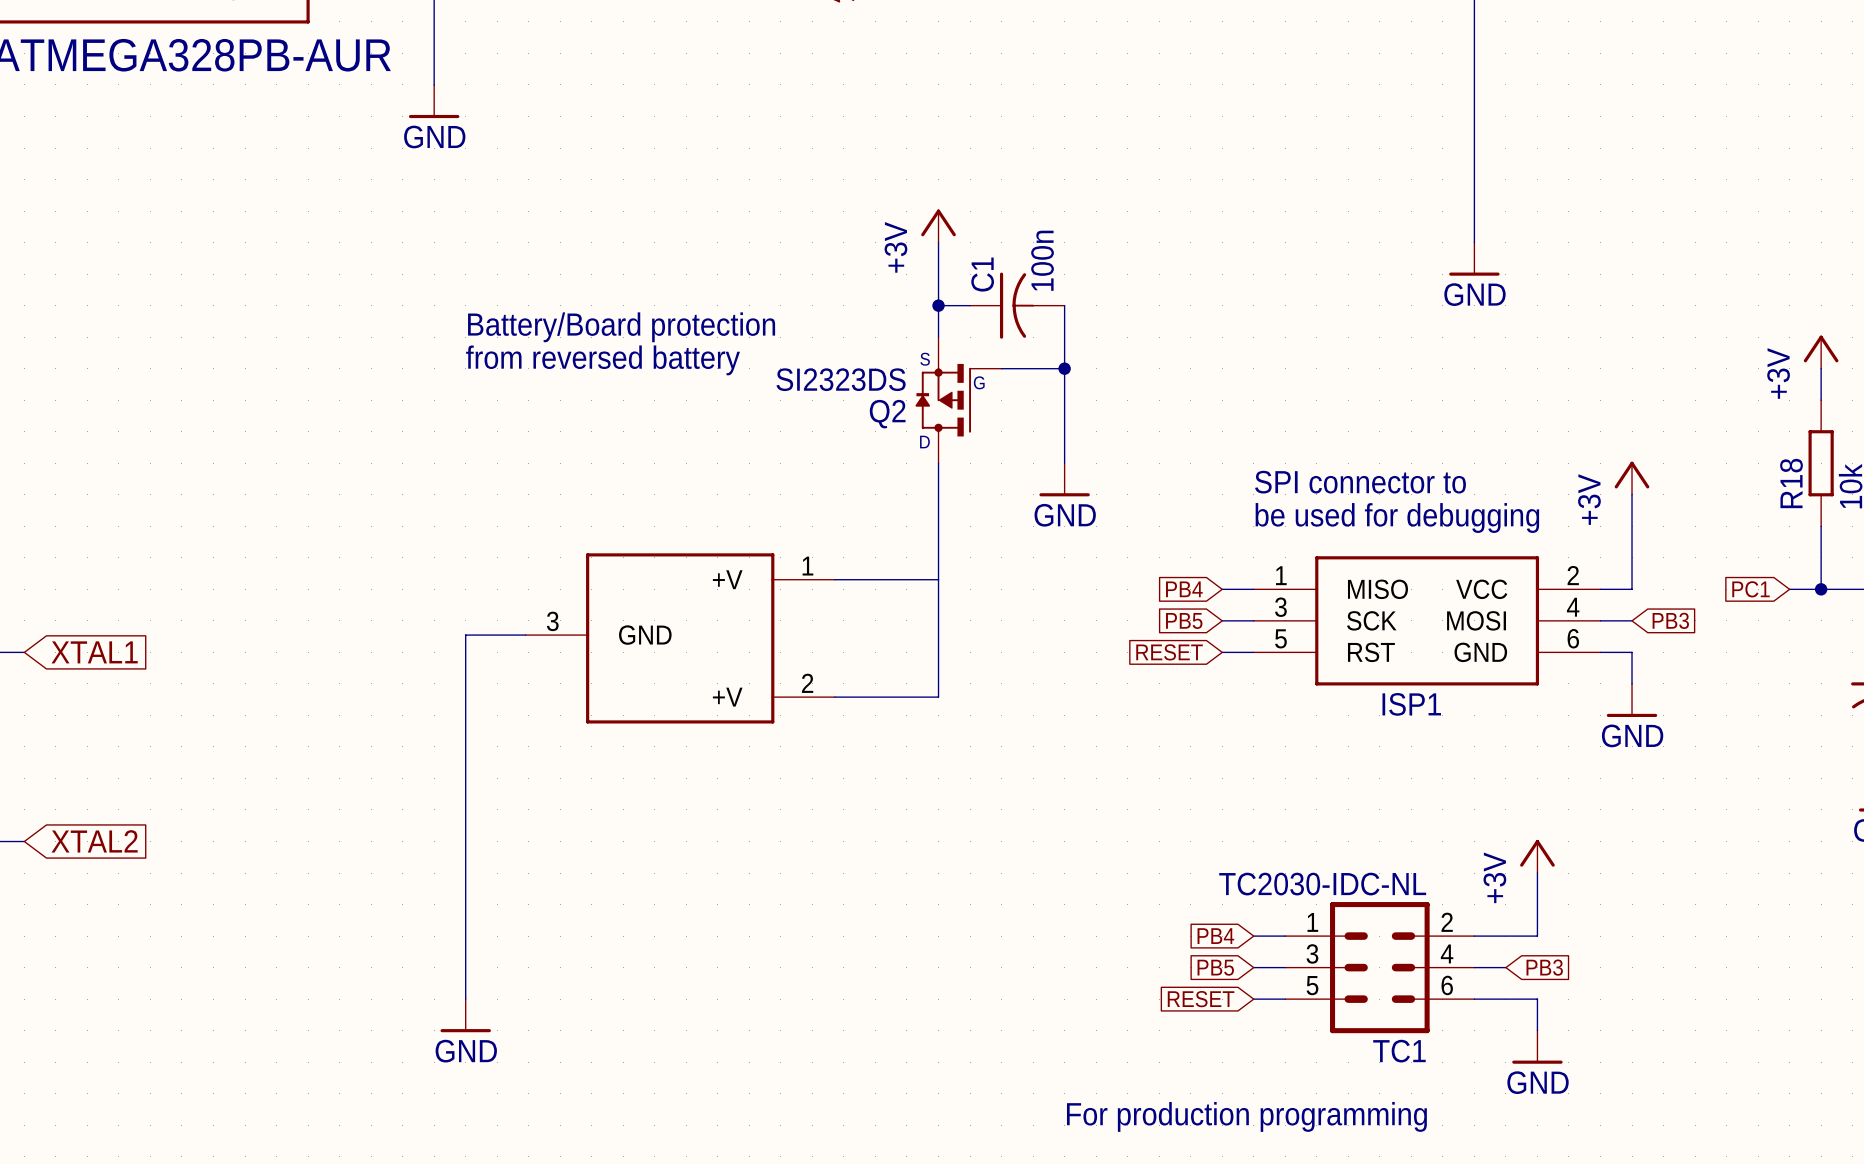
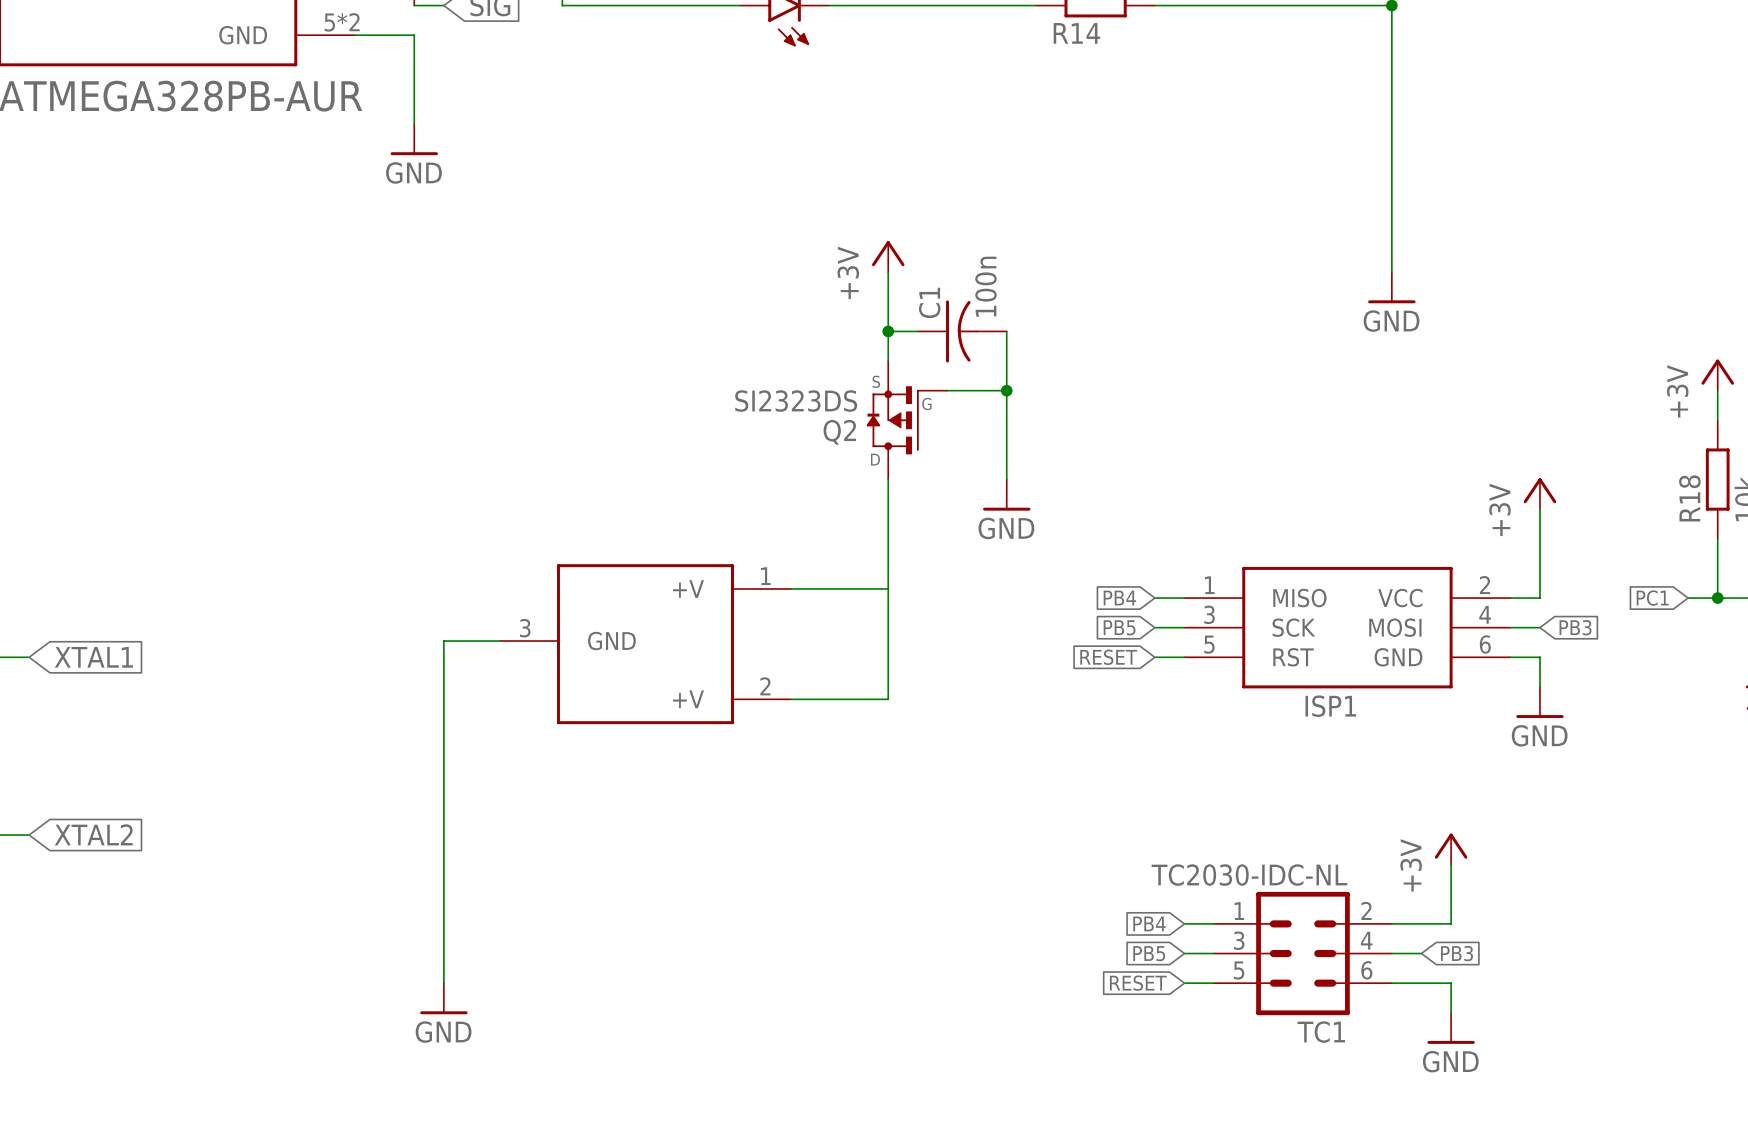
text: Battery/Board protection (621, 327) -> none
text: from reversed battery (603, 360) -> none
text: SPI connector to (1360, 482) -> none
text: be used for debugging (1397, 518) -> none
text: For production programming (1246, 1116) -> none

